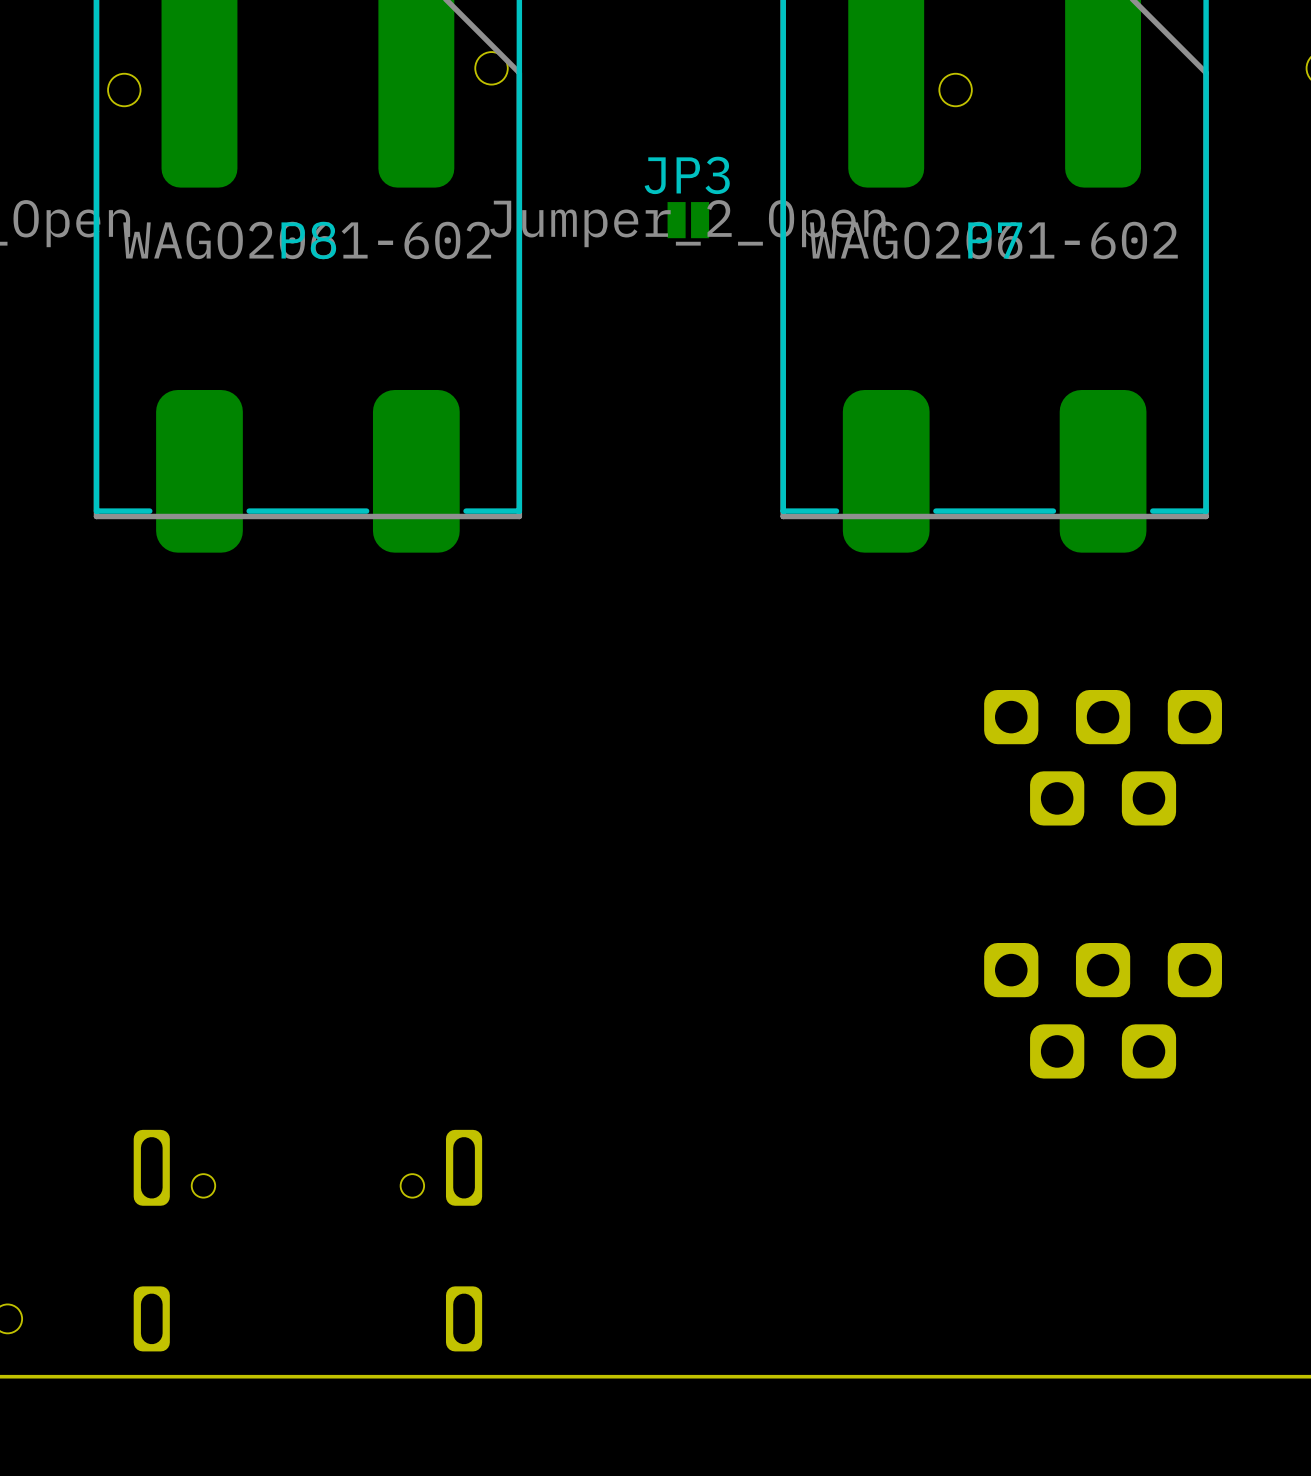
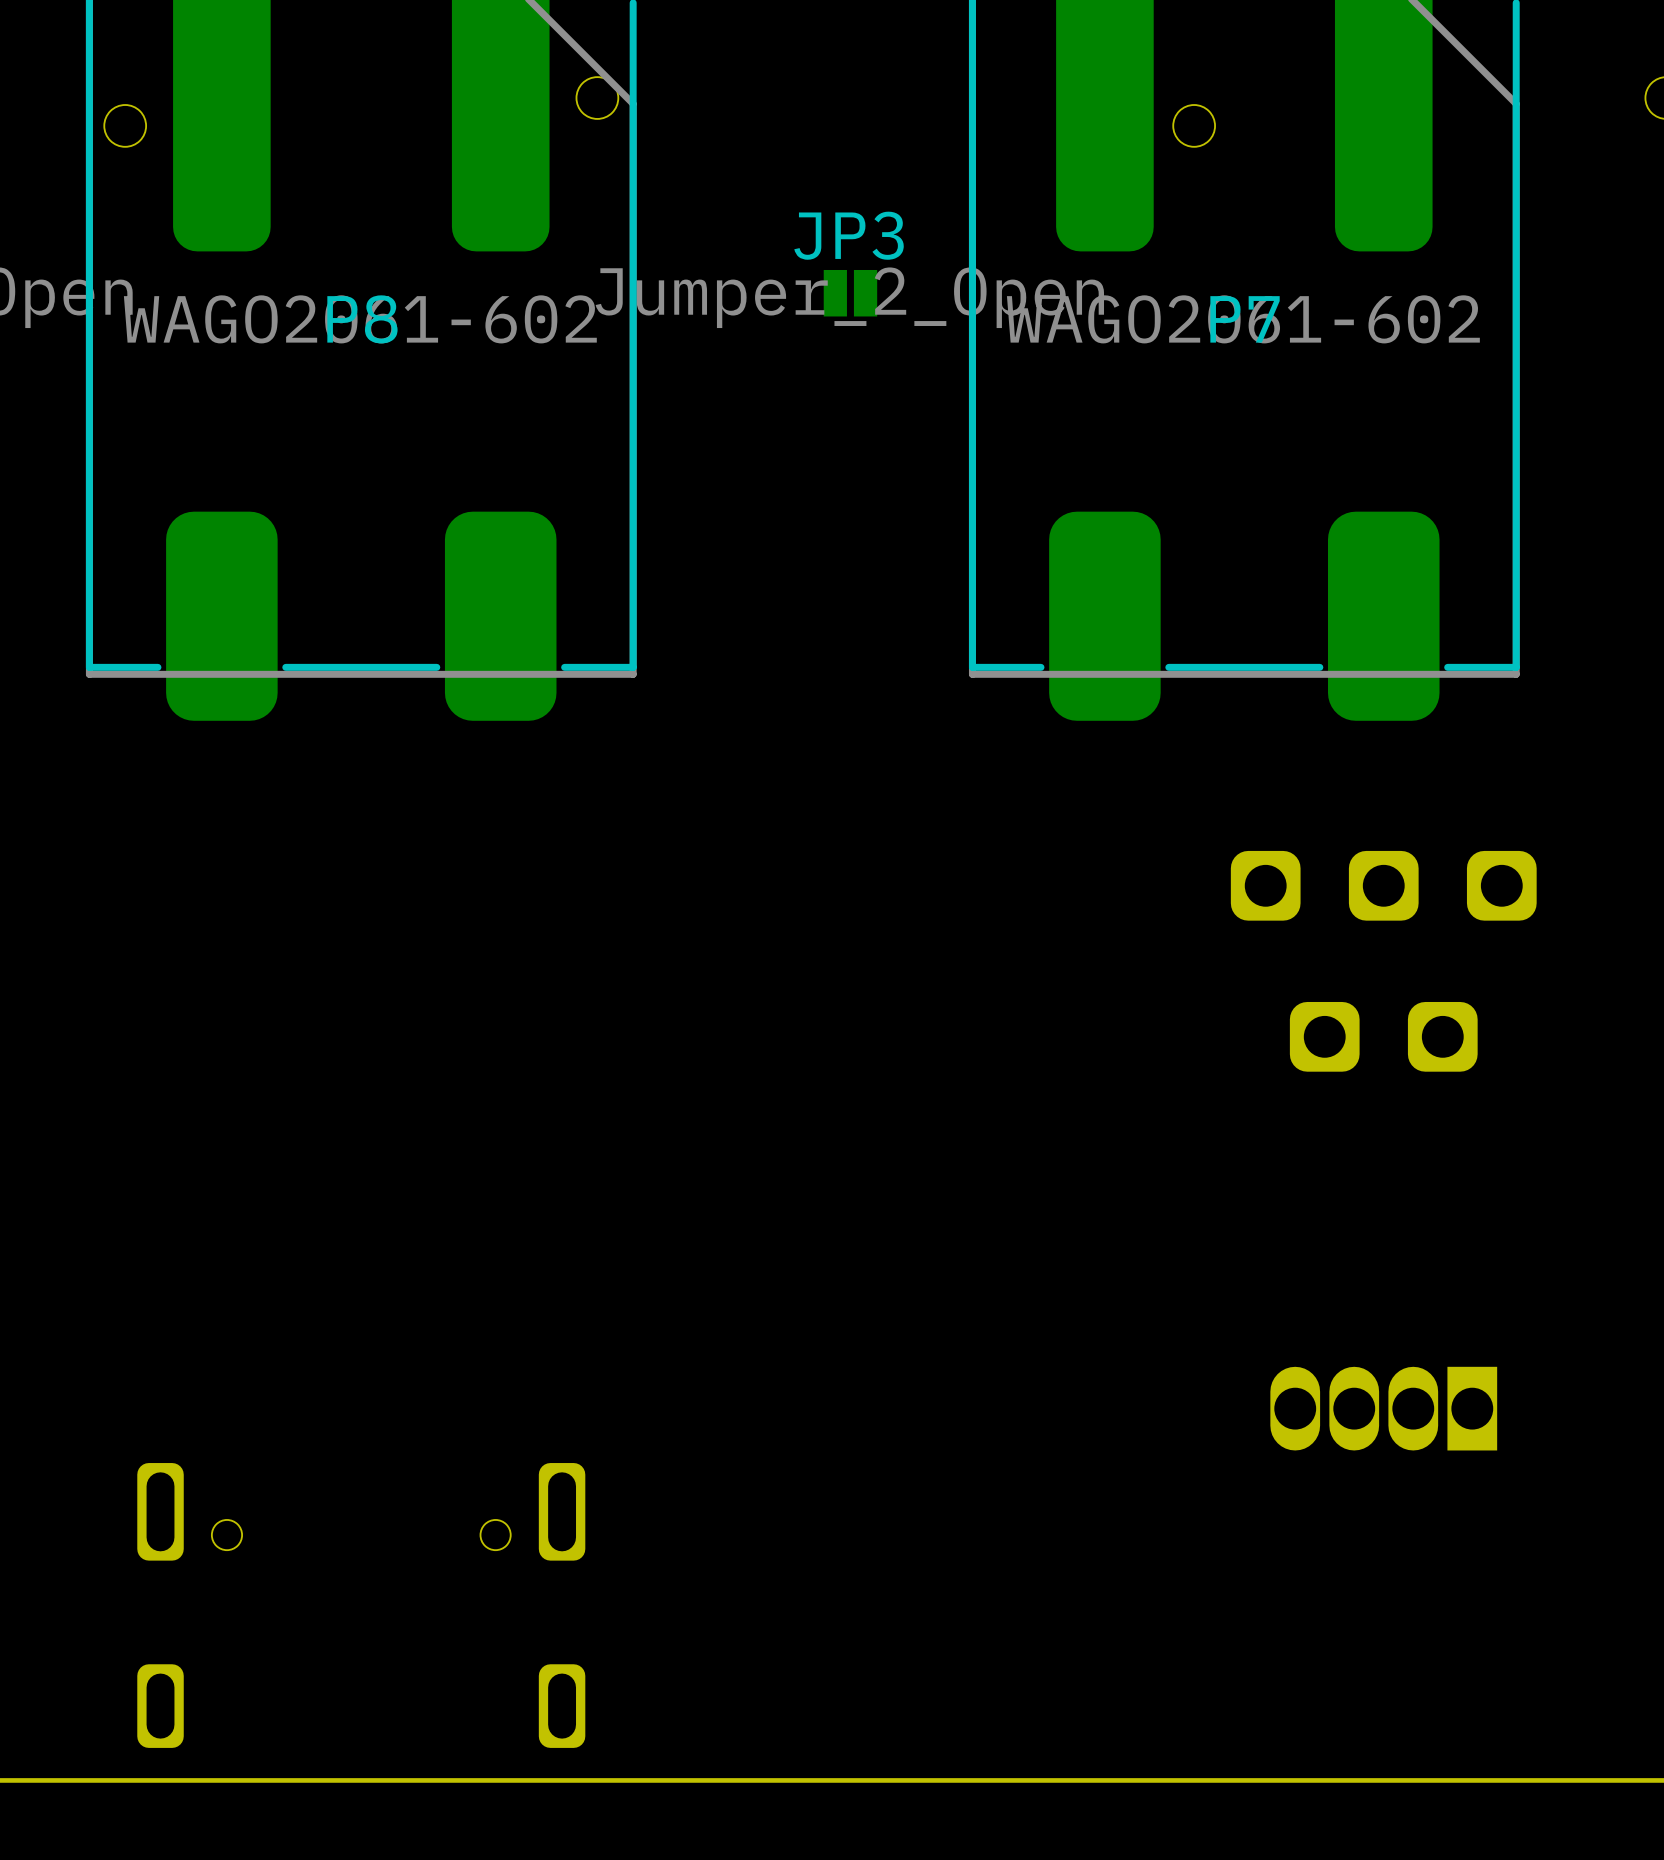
part position: (1103, 717) -> (1383, 885)
part: (1103, 970) -> none
part footprint: [1030, 1024, 1177, 1079] -> [1270, 1366, 1498, 1451]

